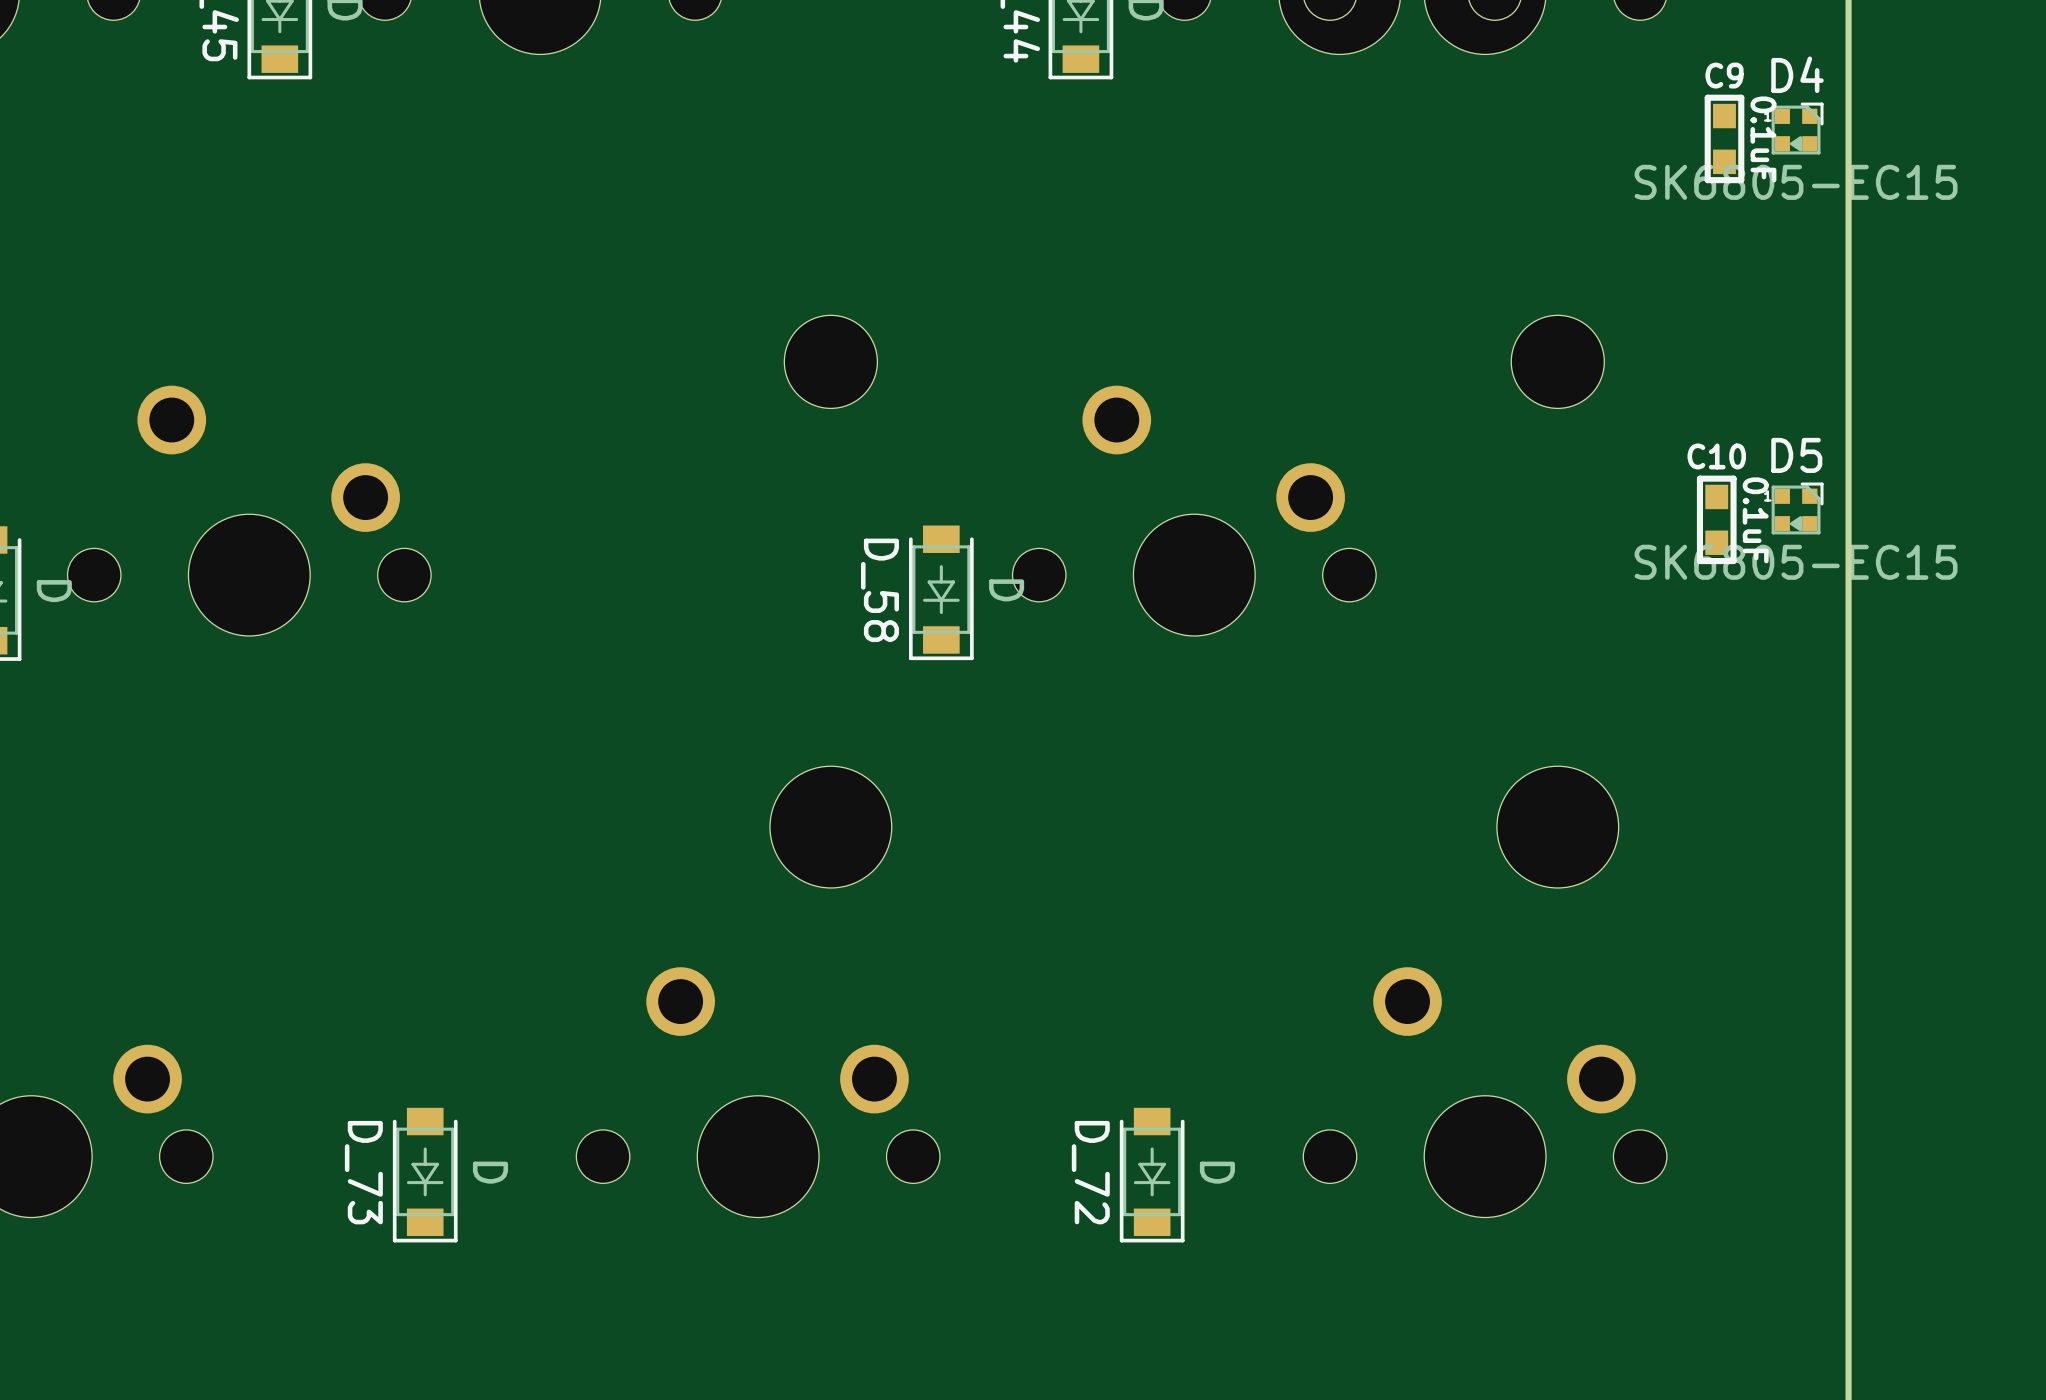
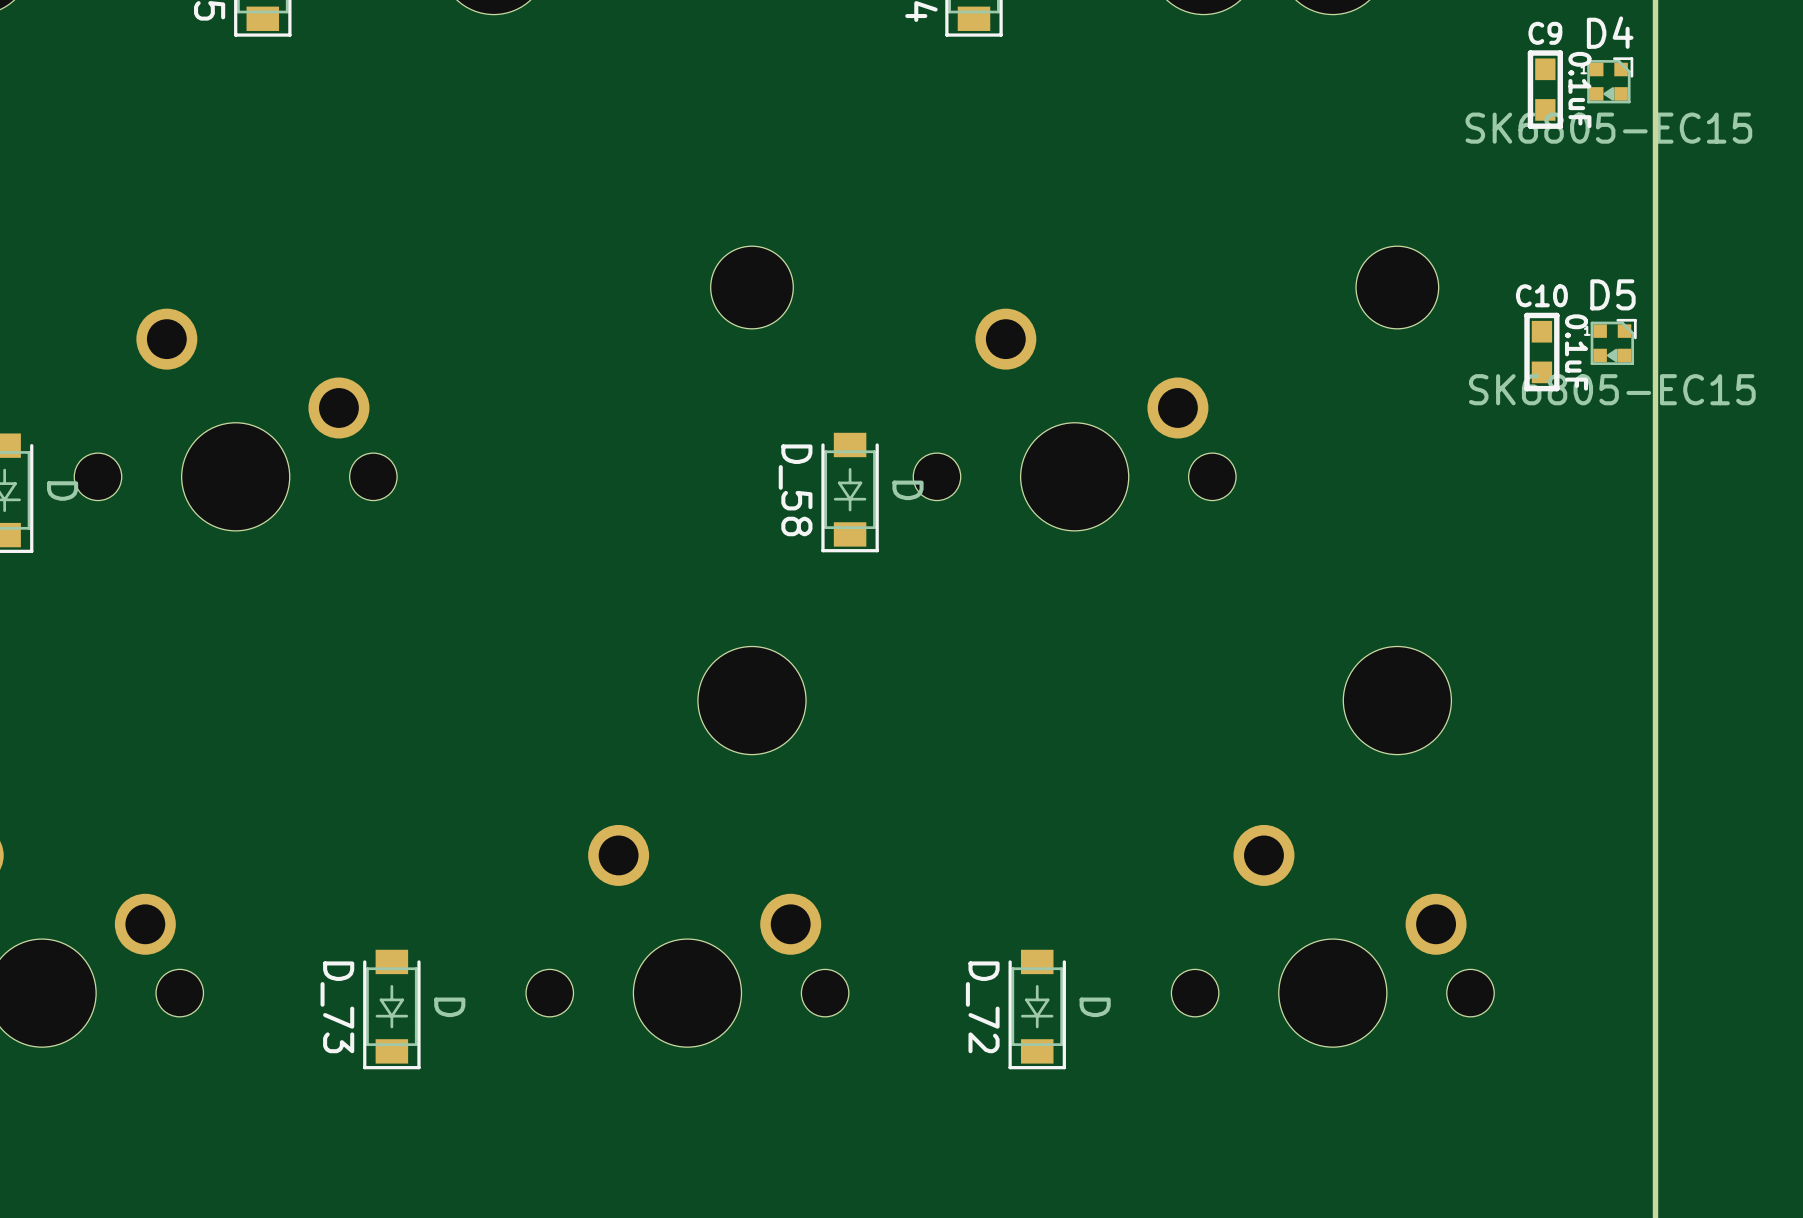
D5 position: (1797, 508) -> (1613, 341)
C10 position: (1716, 519) -> (1541, 352)

